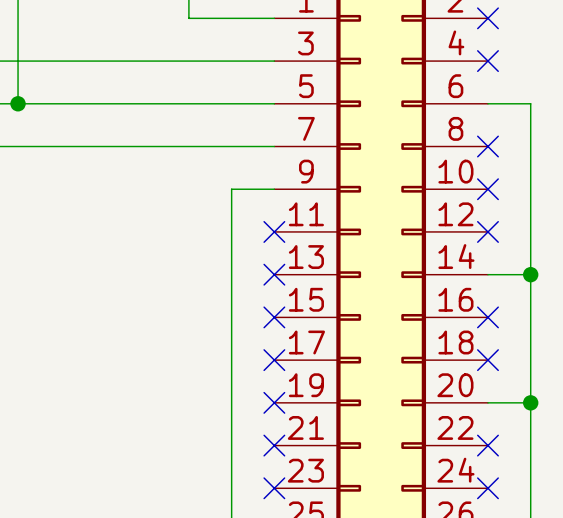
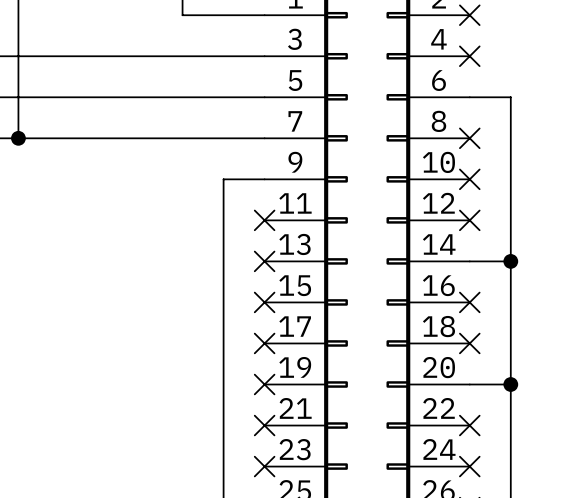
wire: none -> (18, 97) (18, 138)
junction position: (18, 103) -> (18, 138)

